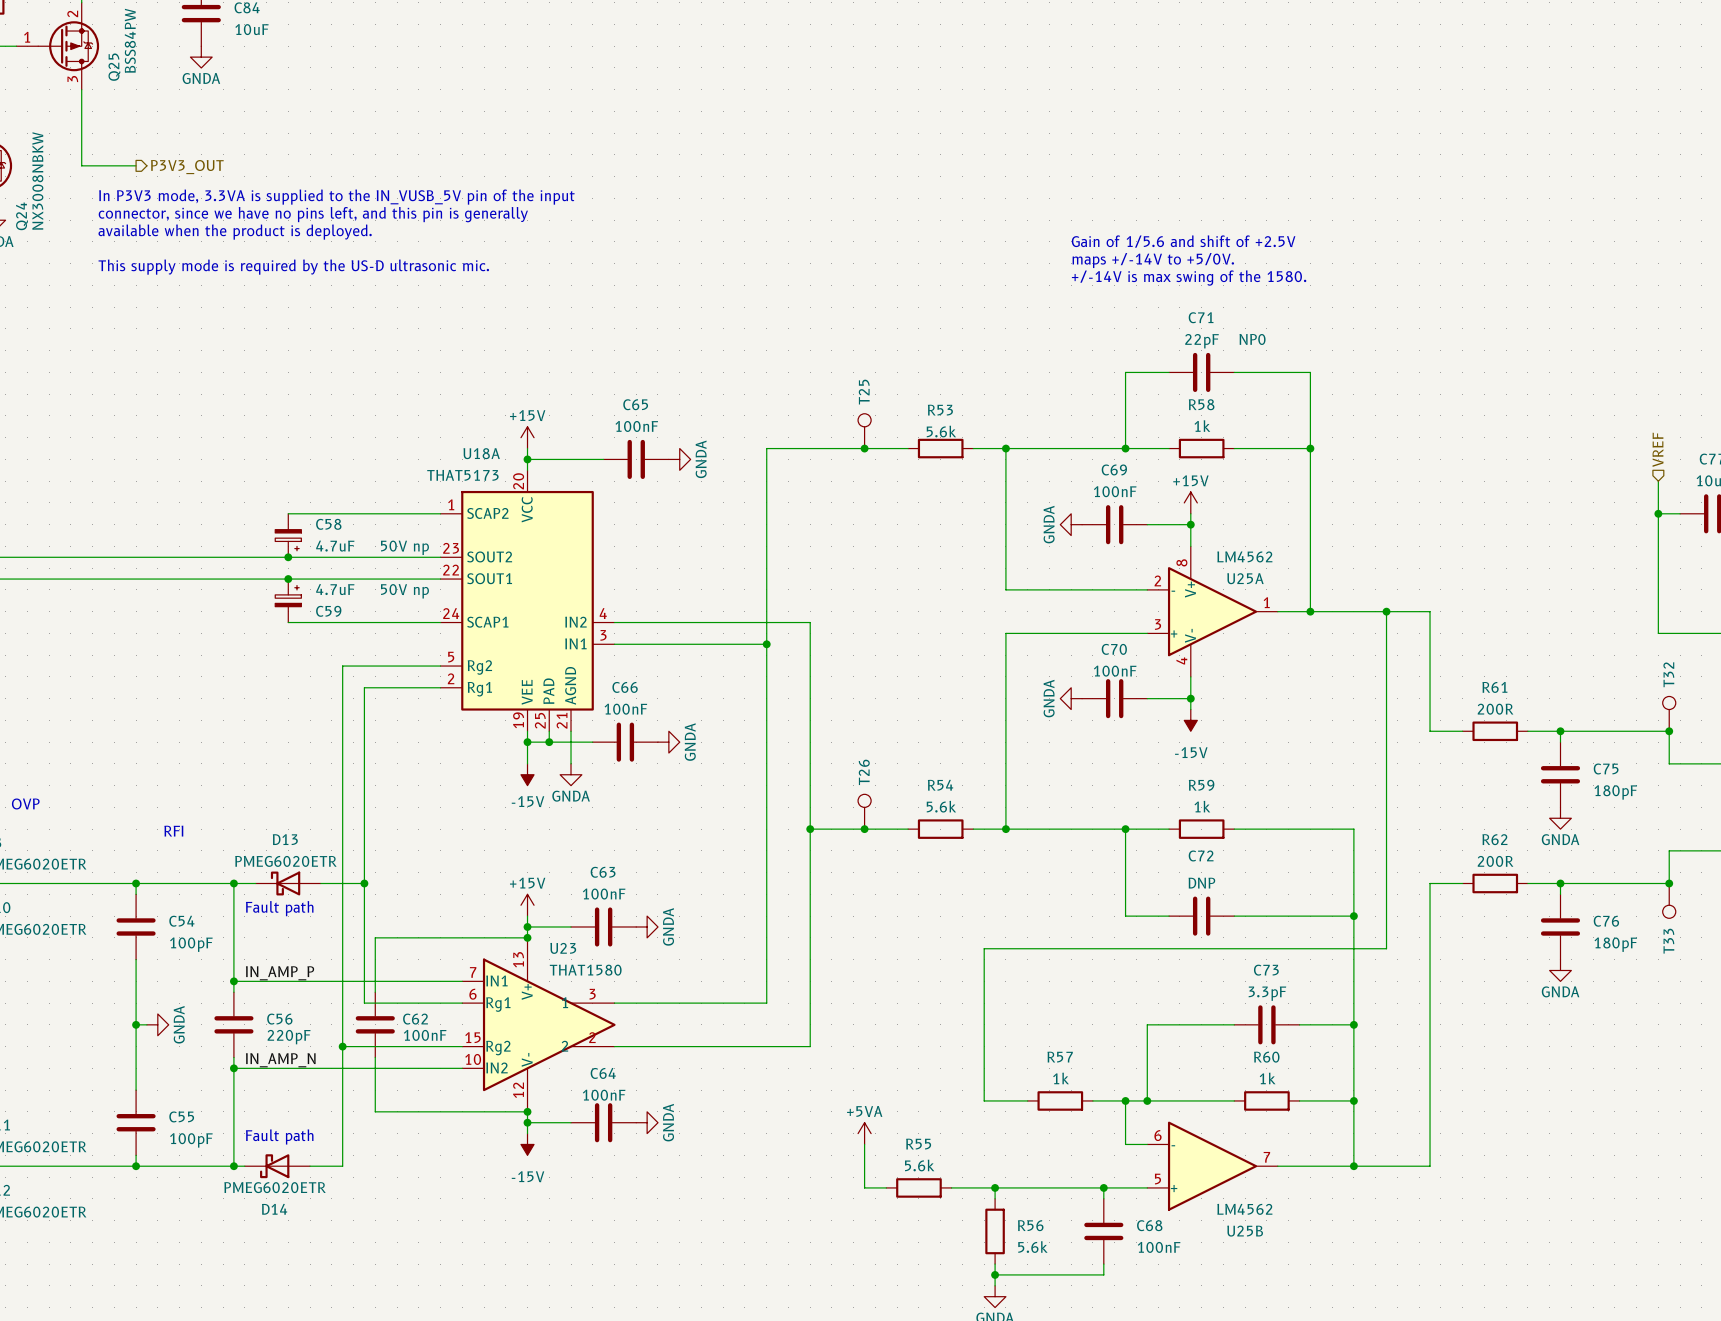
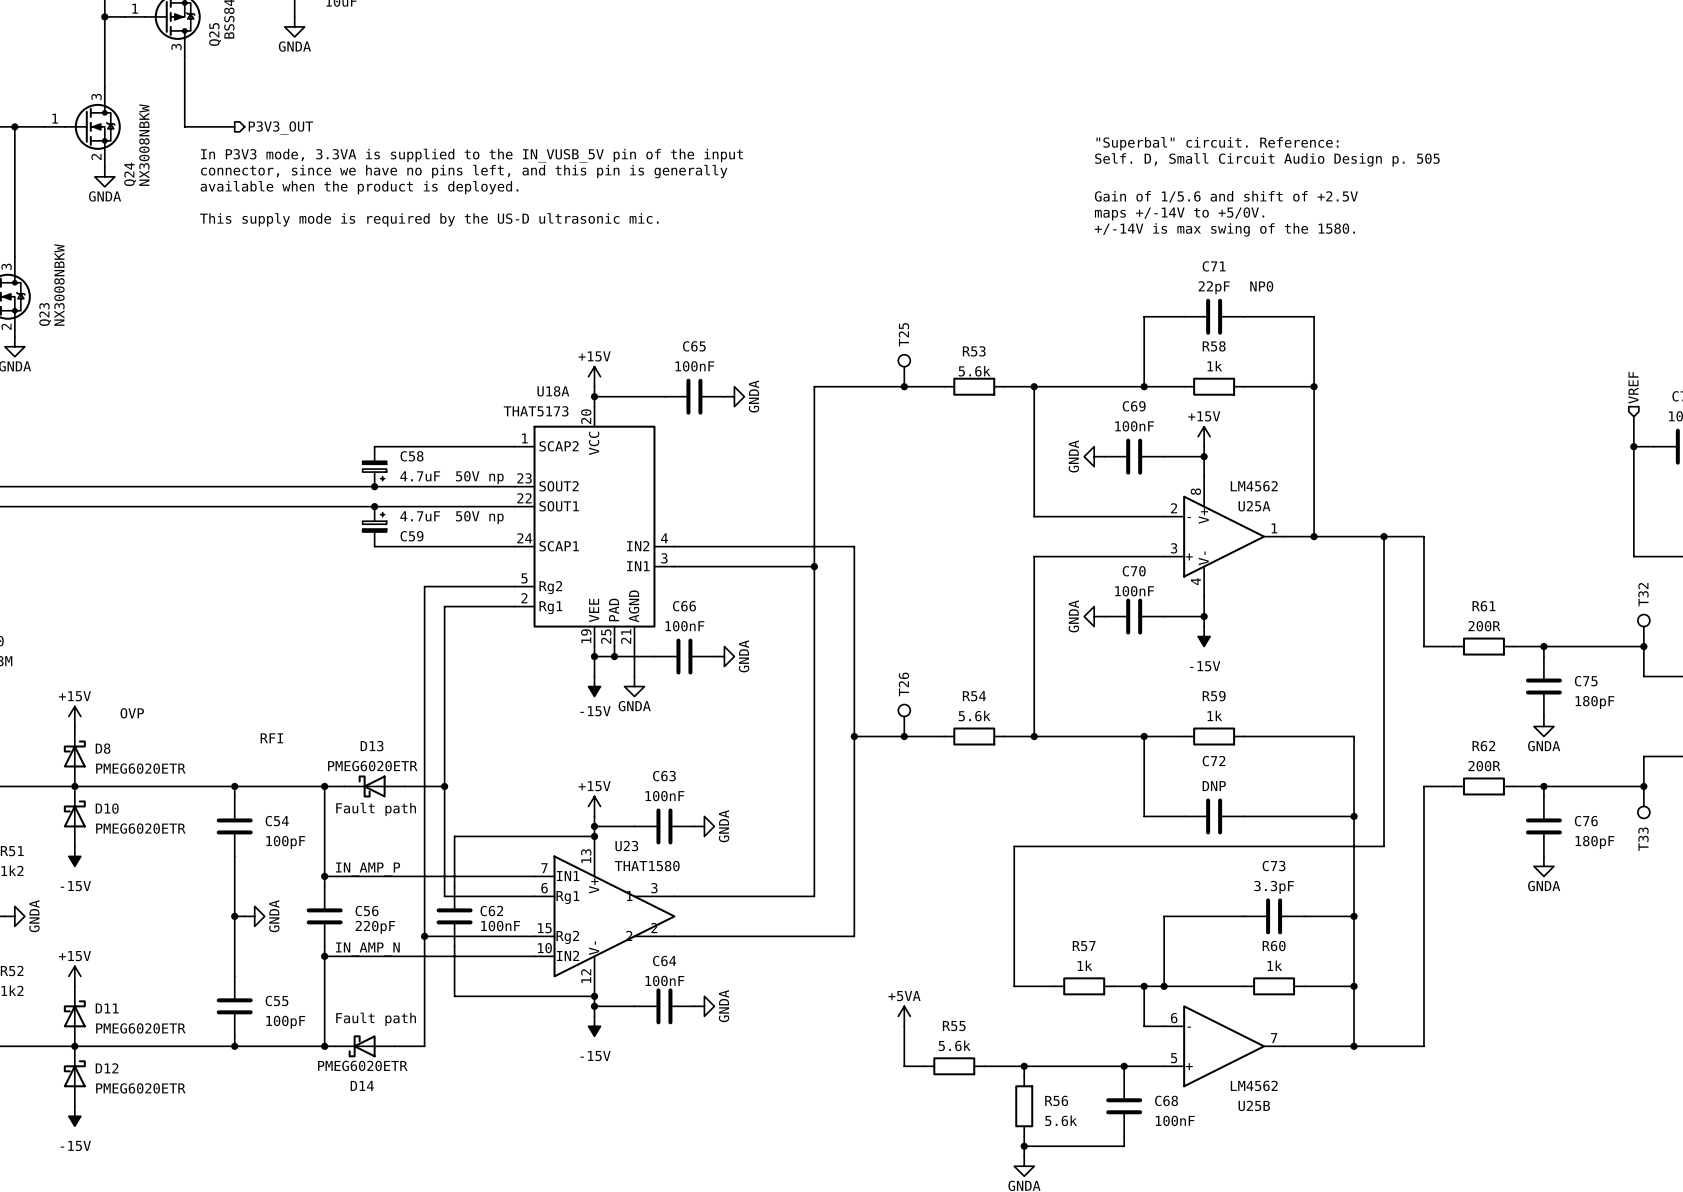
text: none -> "Superbal" circuit. Reference: (1217, 143)
text: none -> Self. D, Small Circuit Audio Design p. 505 (1267, 159)

